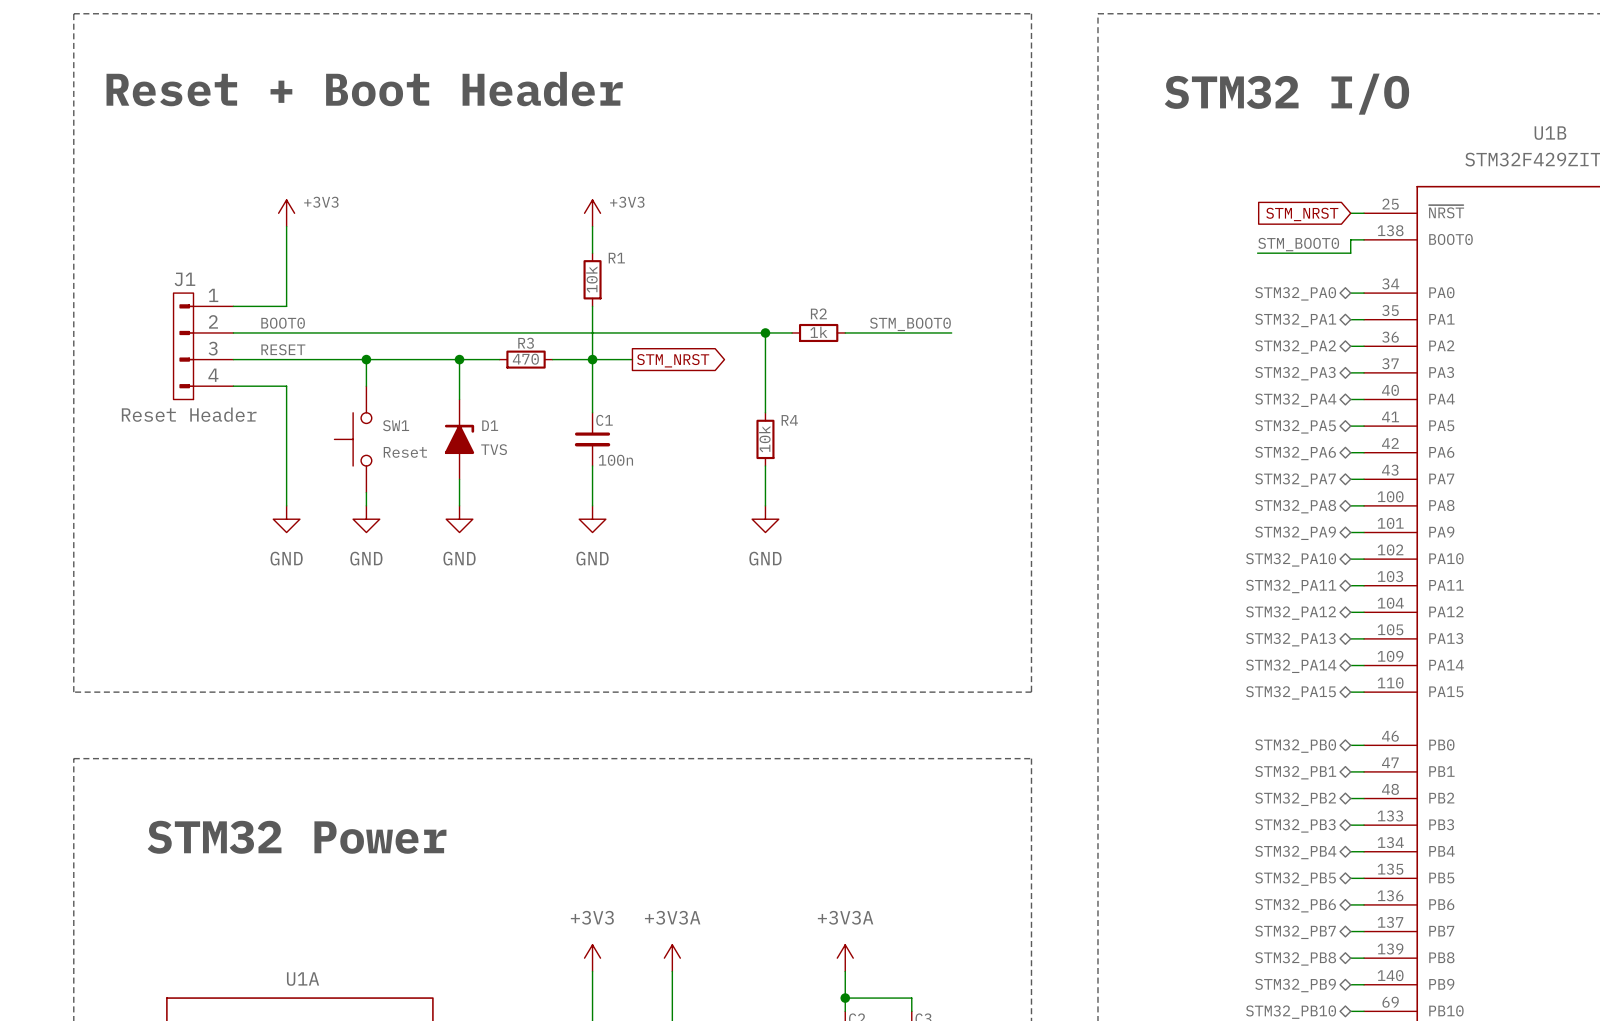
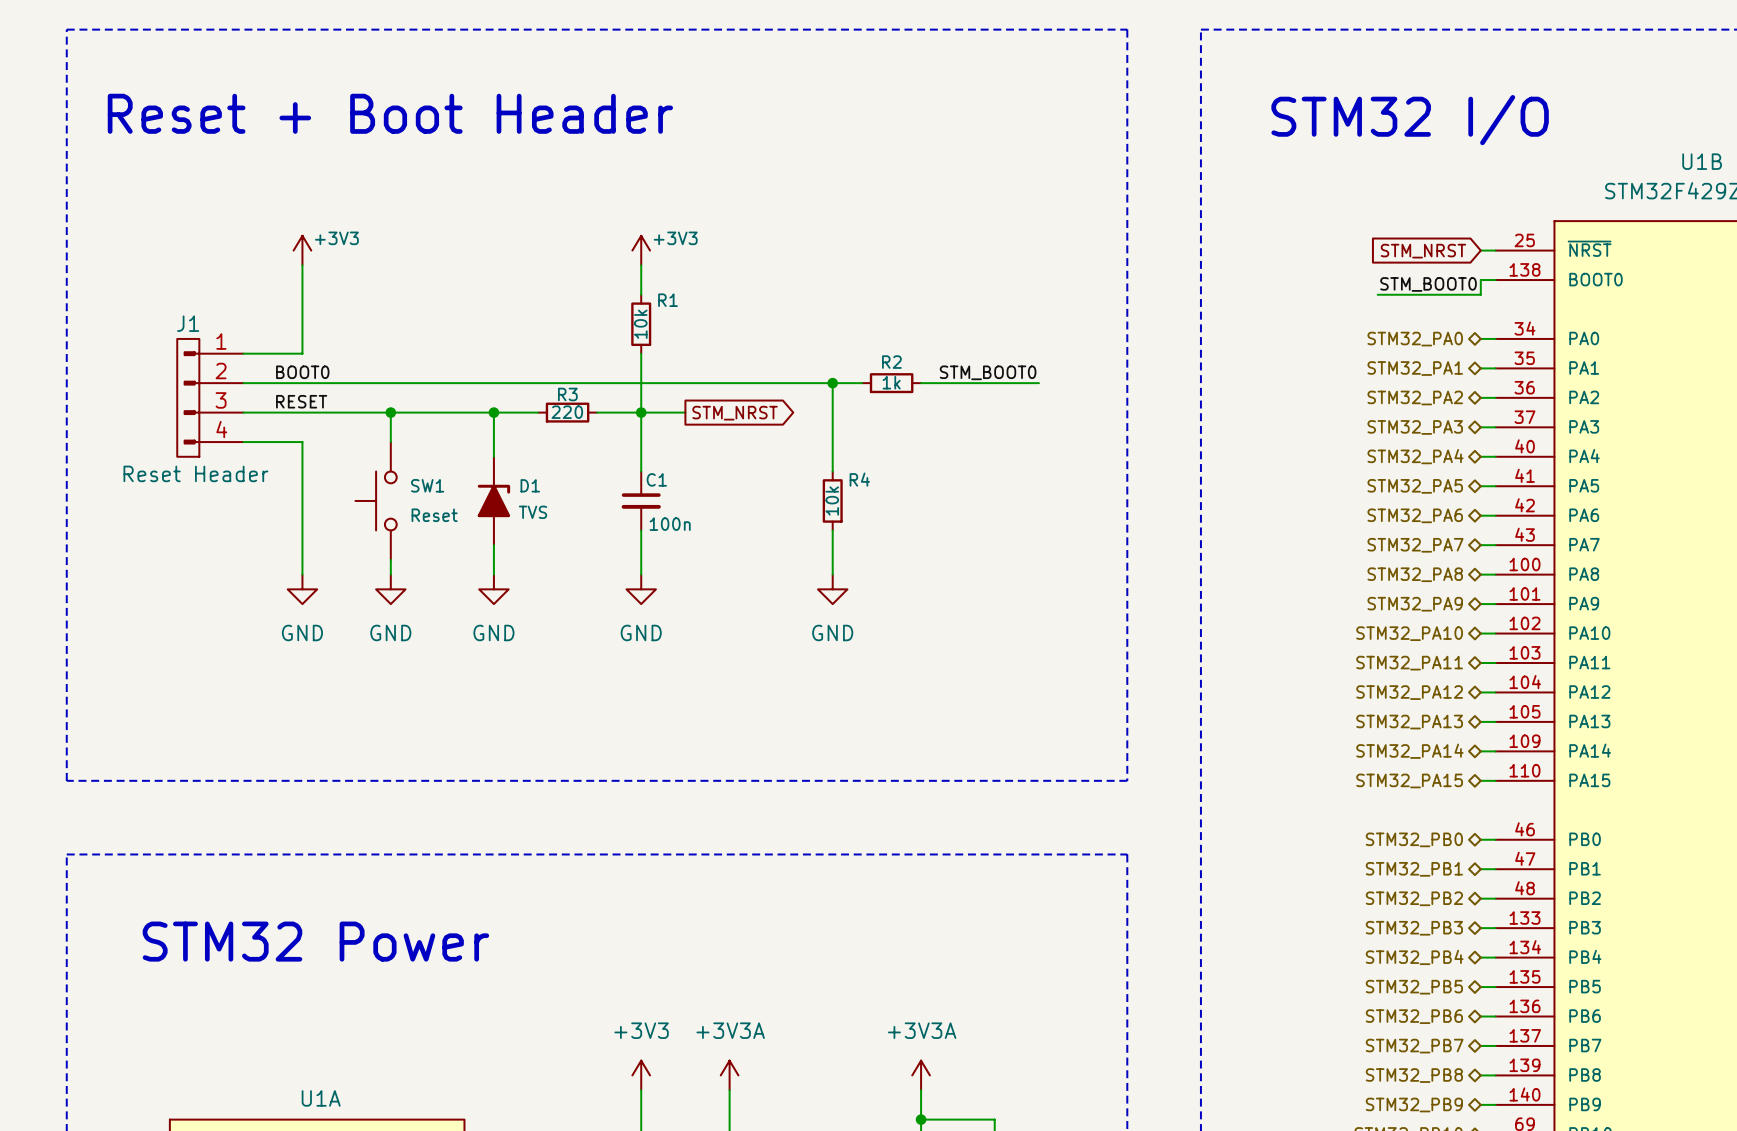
R3 value: 470 (525, 359) -> 220 (567, 412)

